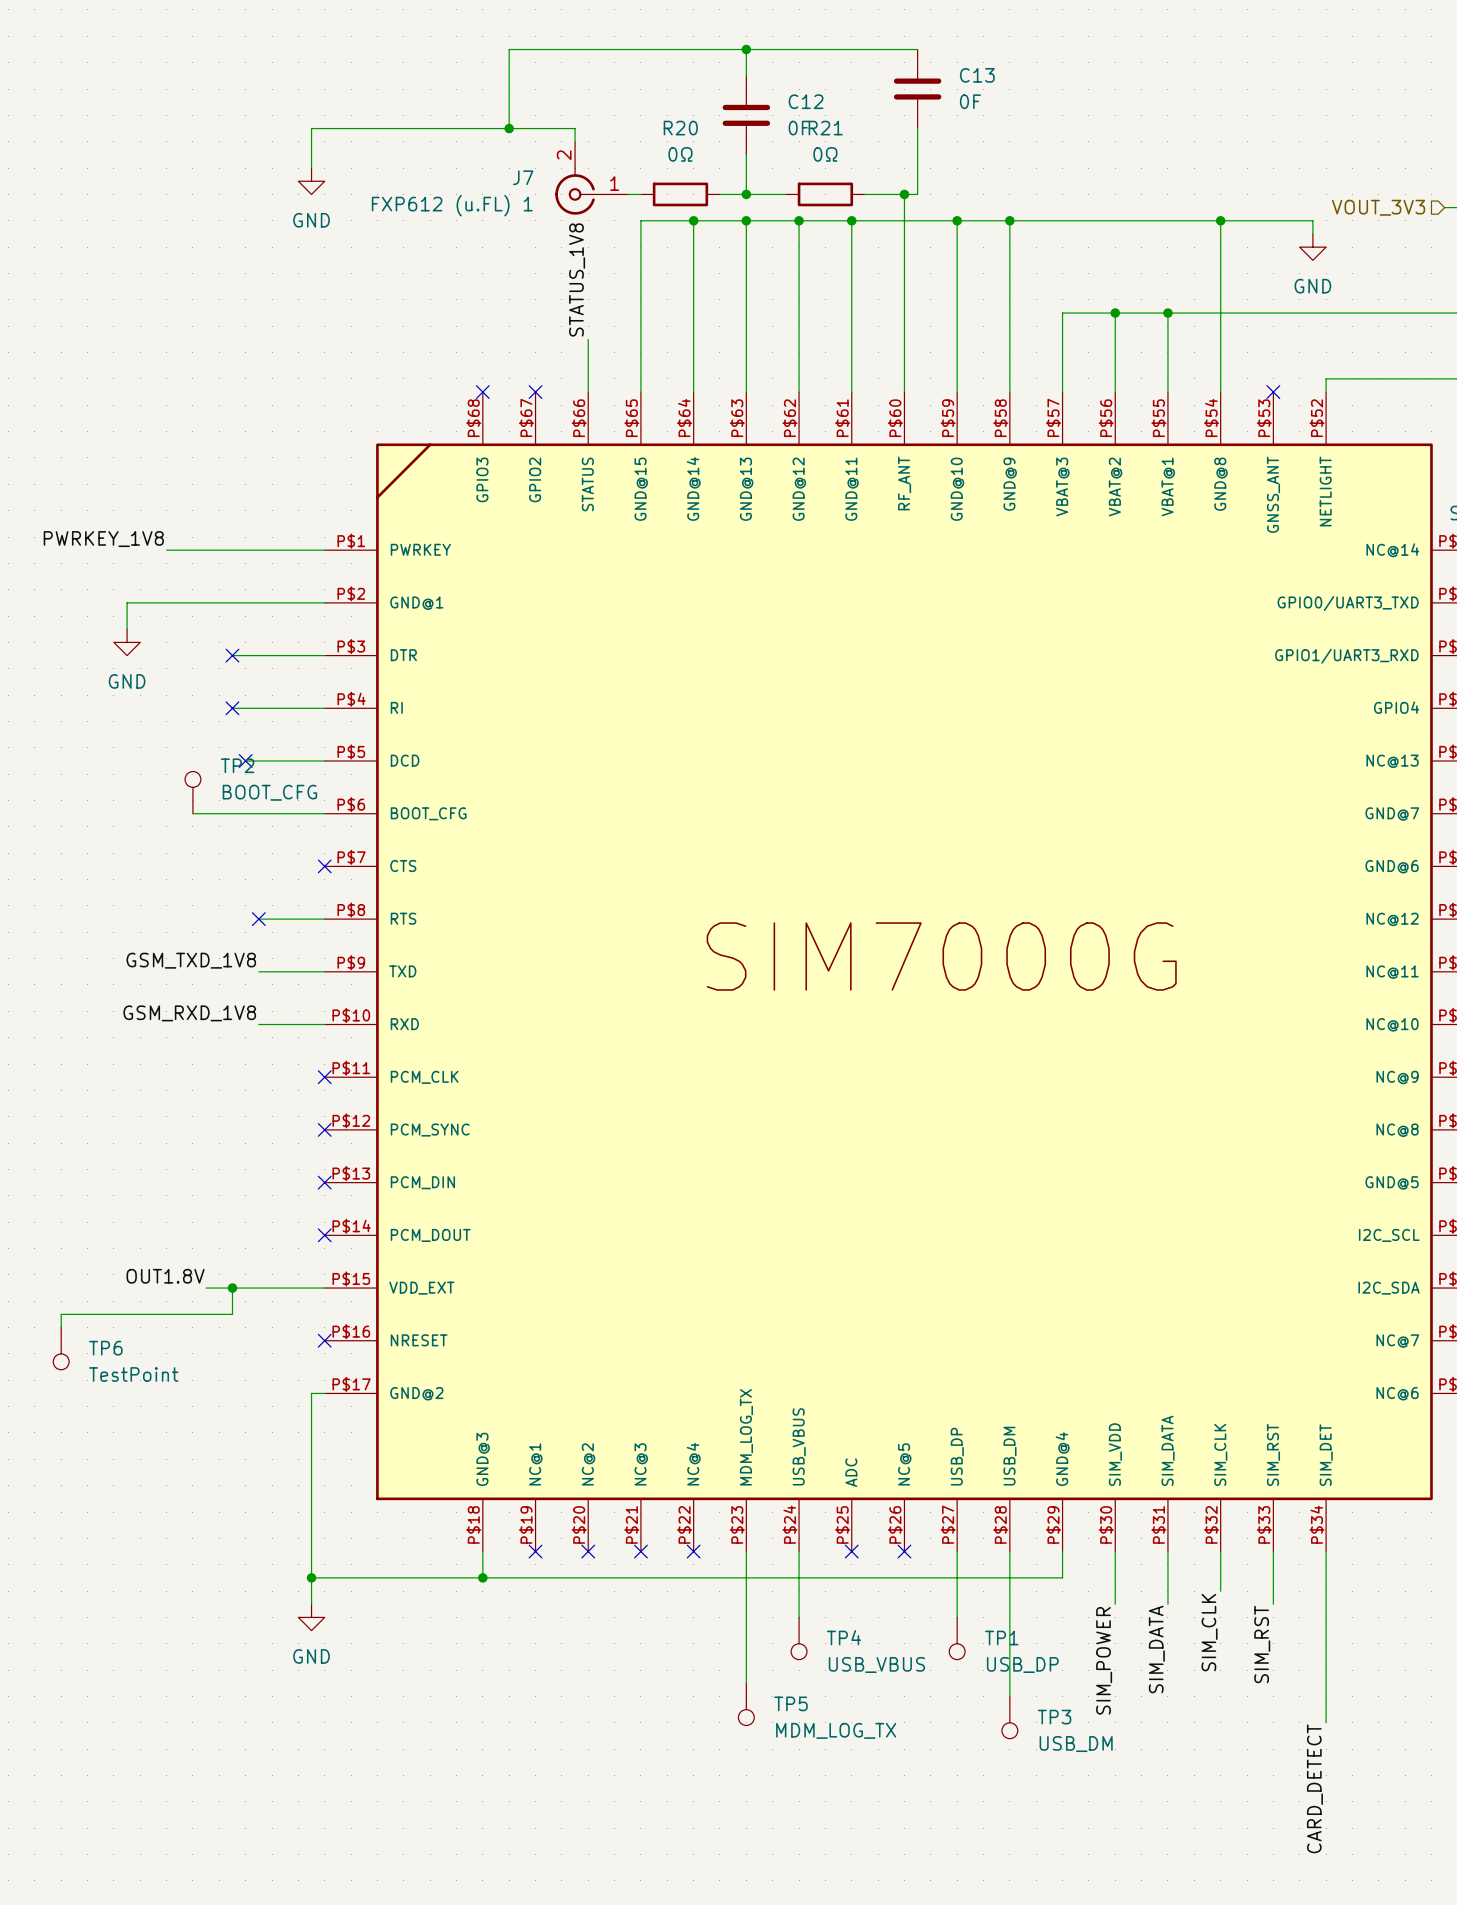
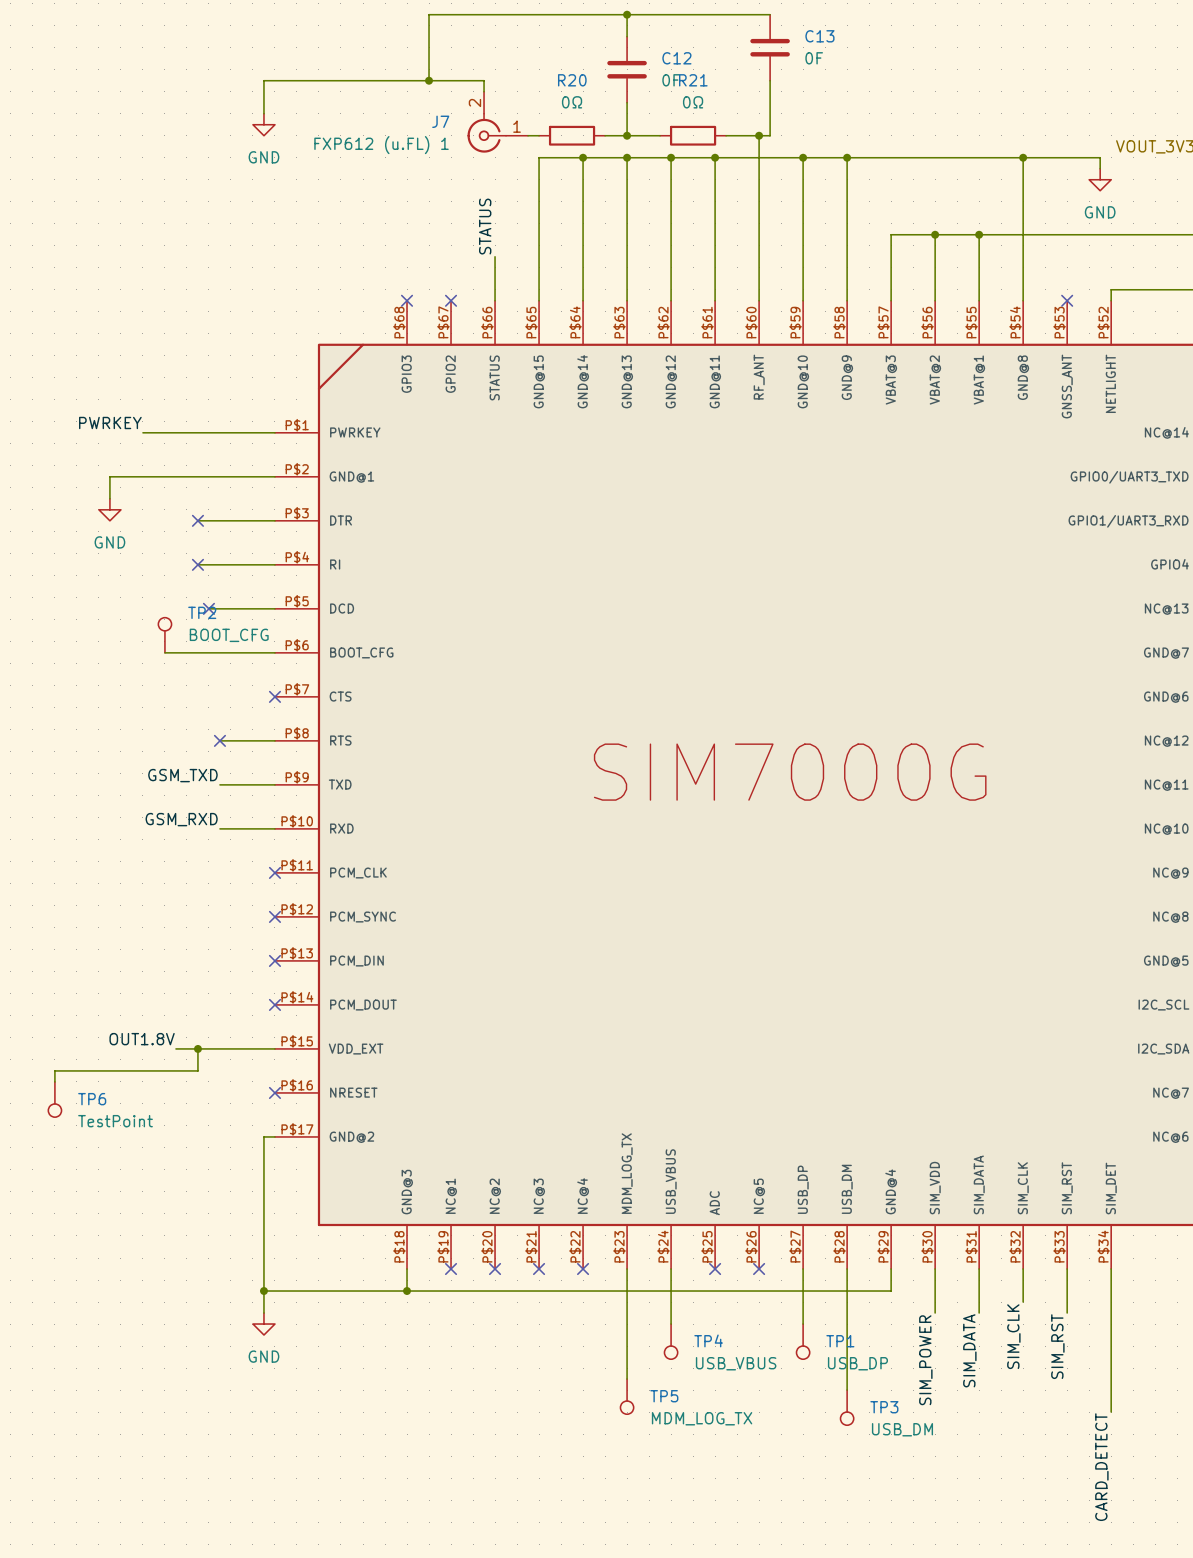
label: STATUS_1V8 (577, 279) -> STATUS (485, 226)
label: PWRKEY_1V8 (103, 539) -> PWRKEY (110, 422)
label: GSM_TXD_1V8 (191, 960) -> GSM_TXD (182, 775)
label: GSM_RXD_1V8 (189, 1013) -> GSM_RXD (181, 819)

